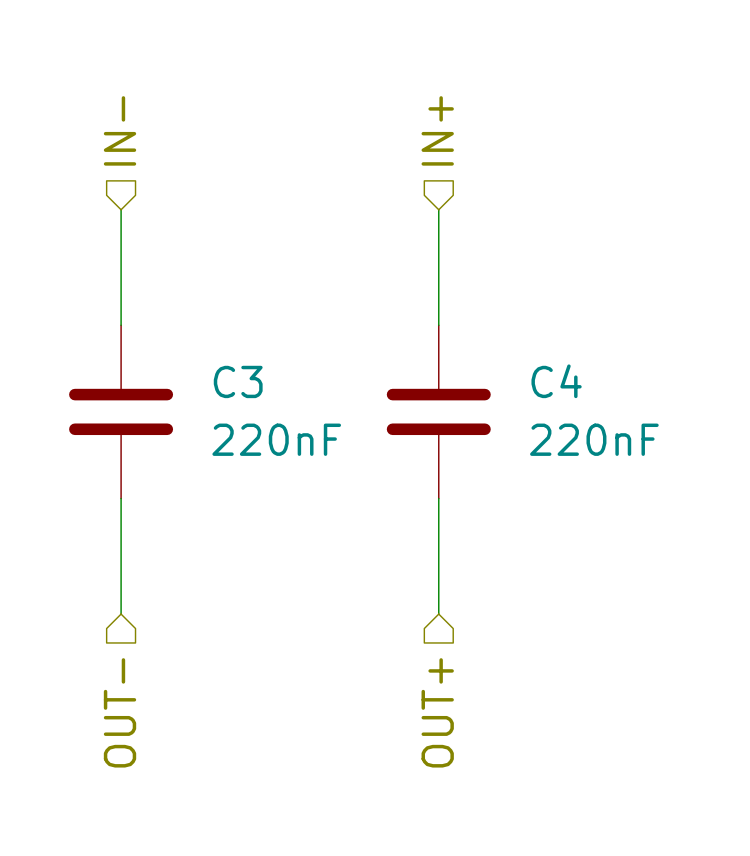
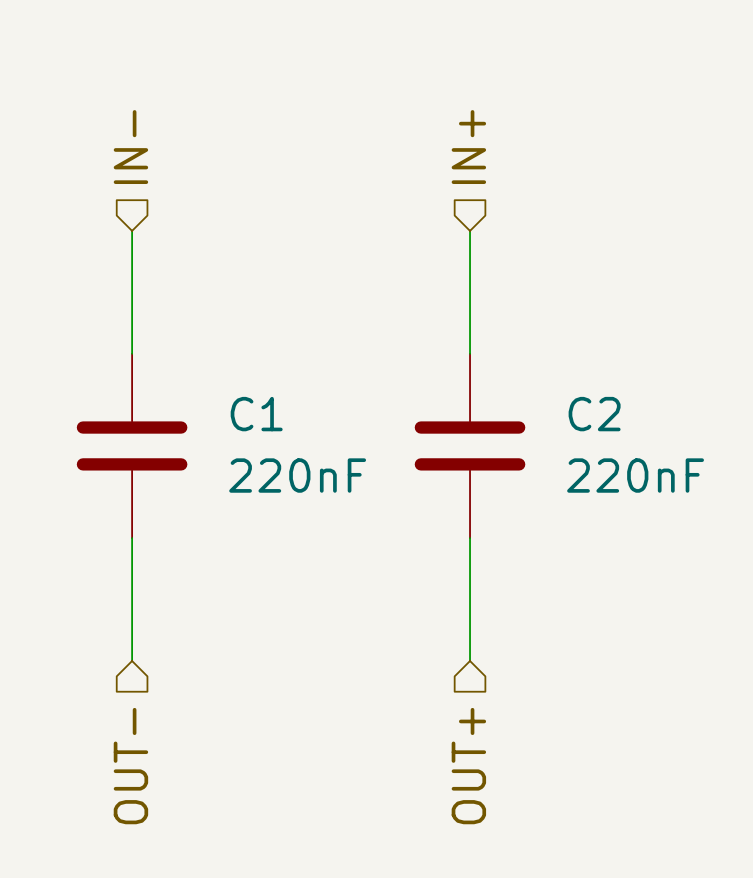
C3 name: C3 (238, 381) -> C1 (256, 414)
C4 name: C4 (556, 381) -> C2 (594, 414)

